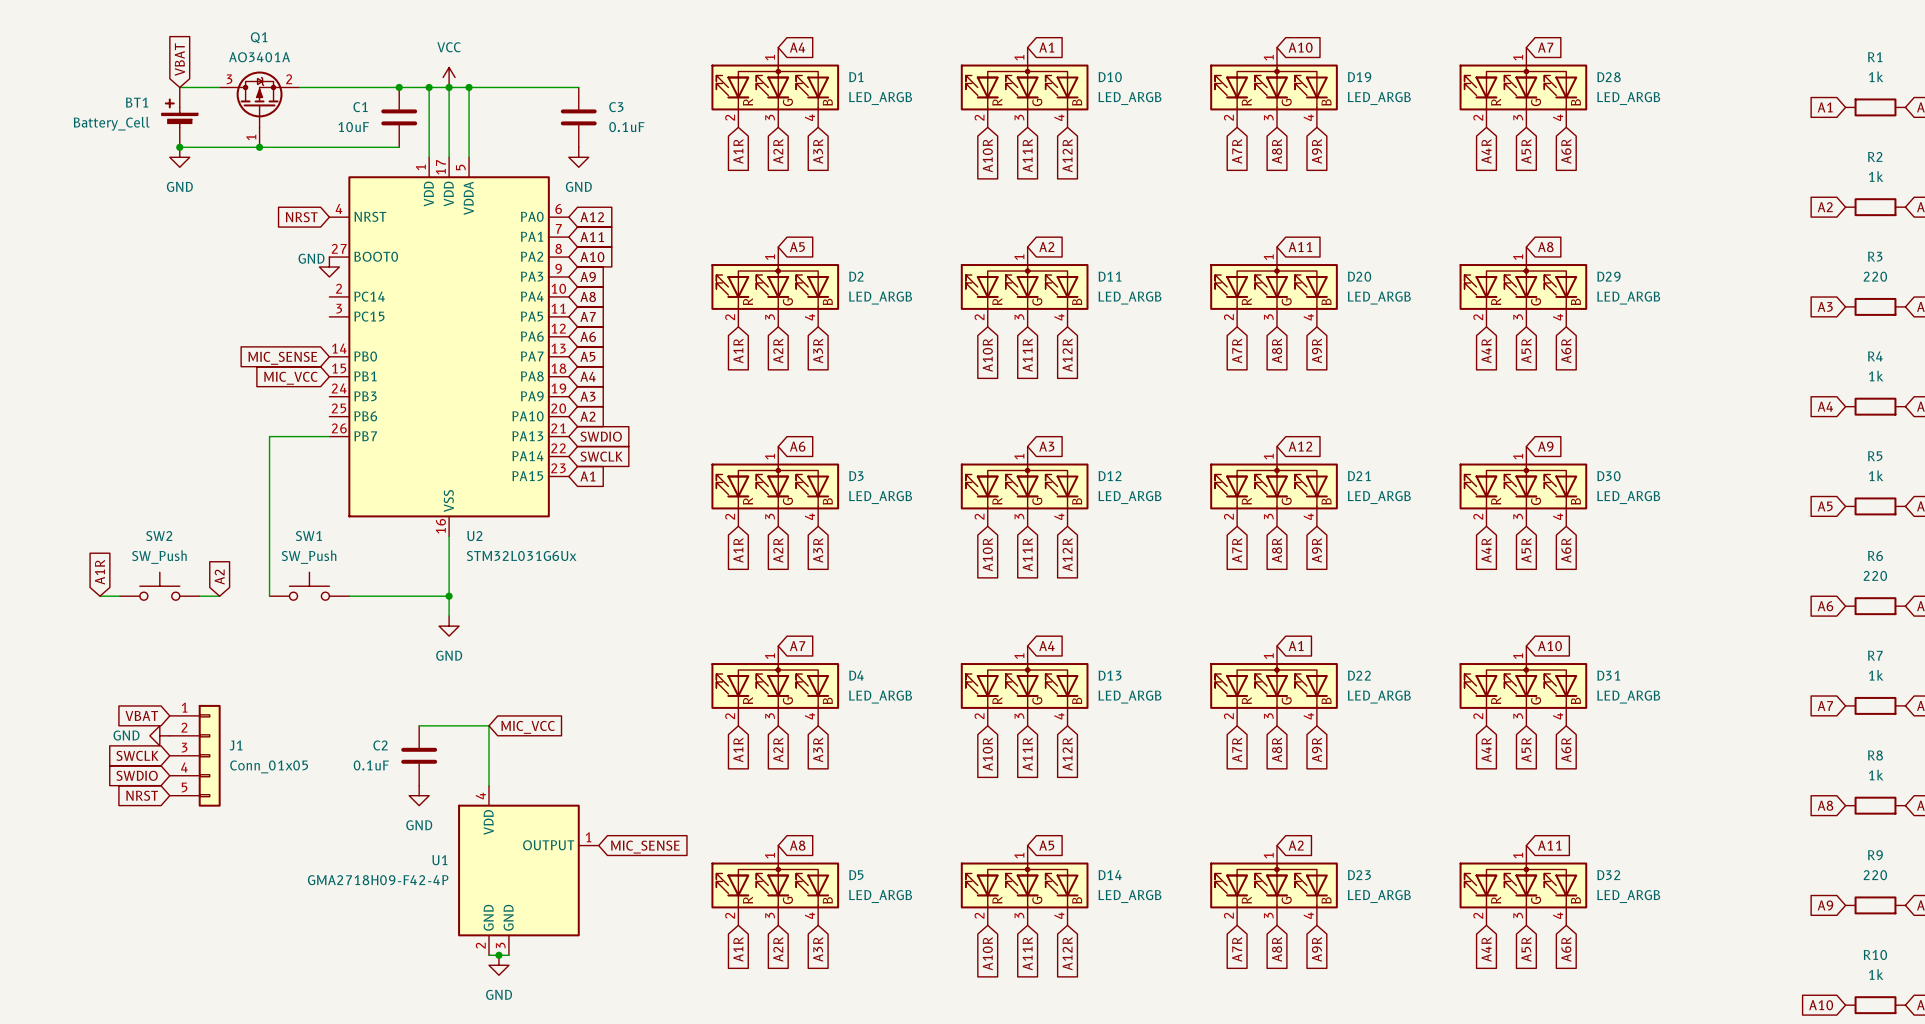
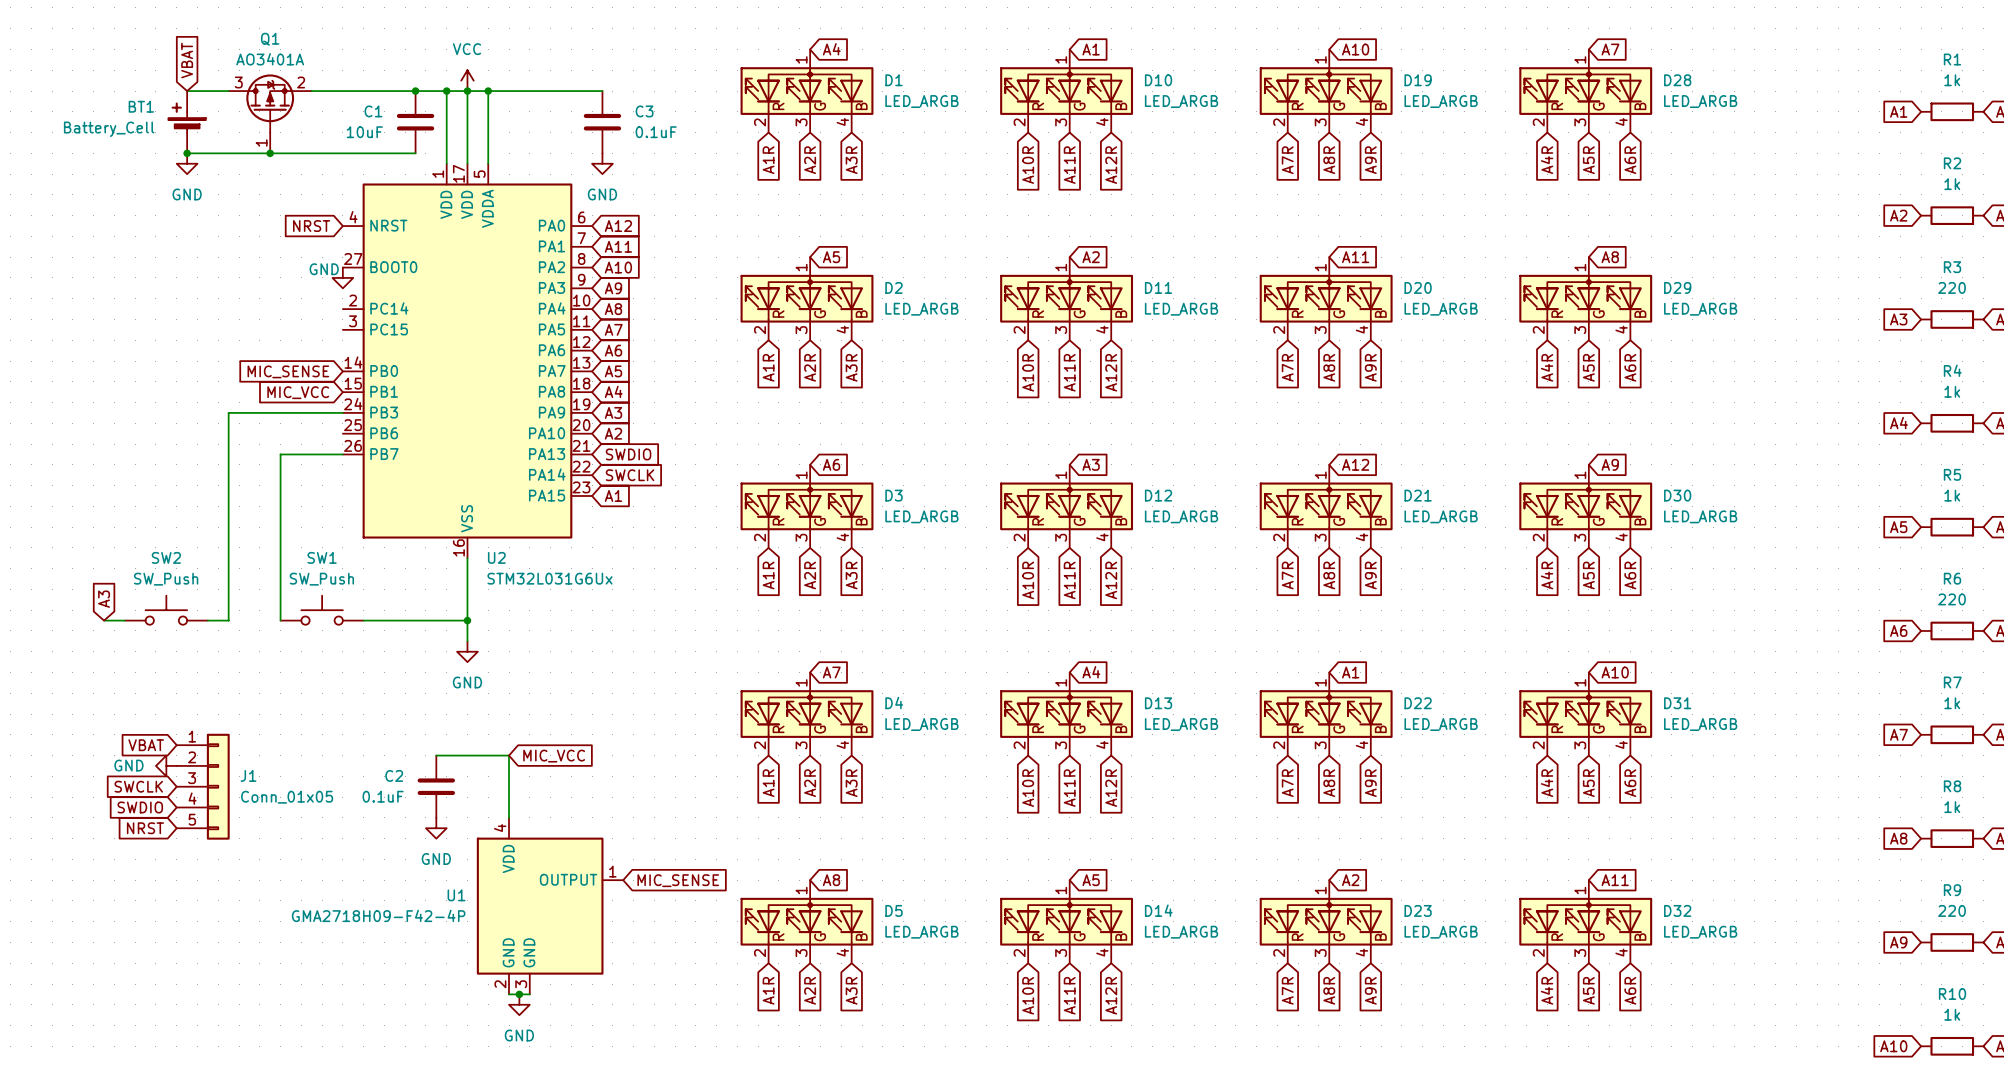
wire: none -> (342, 412) (228, 412) (228, 620)
global label: A1R (99, 572) -> A3 (104, 599)
global label: A2 (219, 577) -> none

